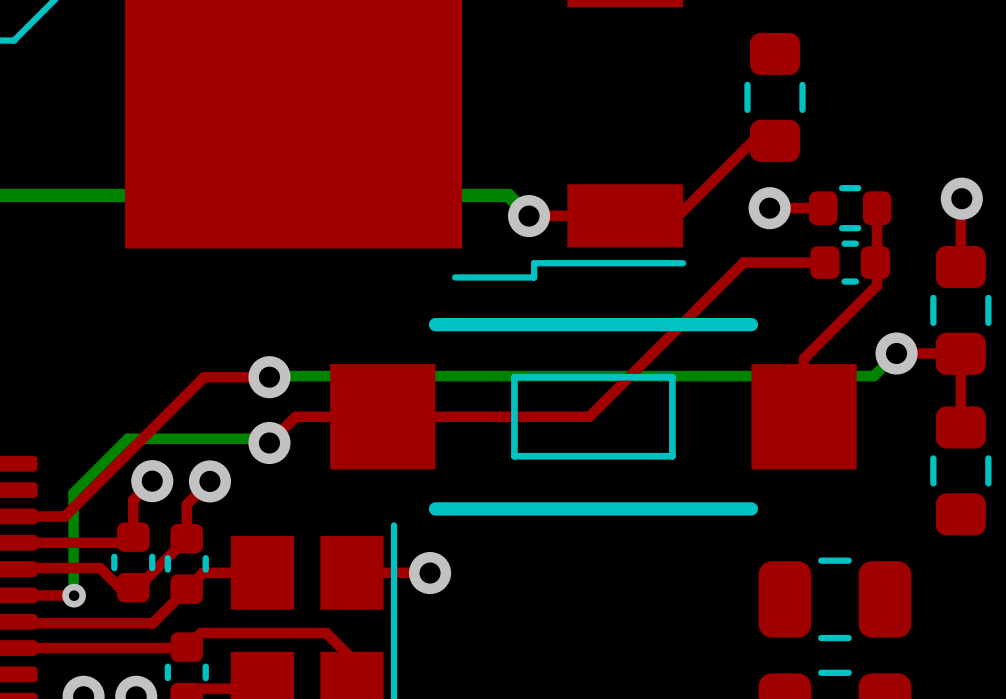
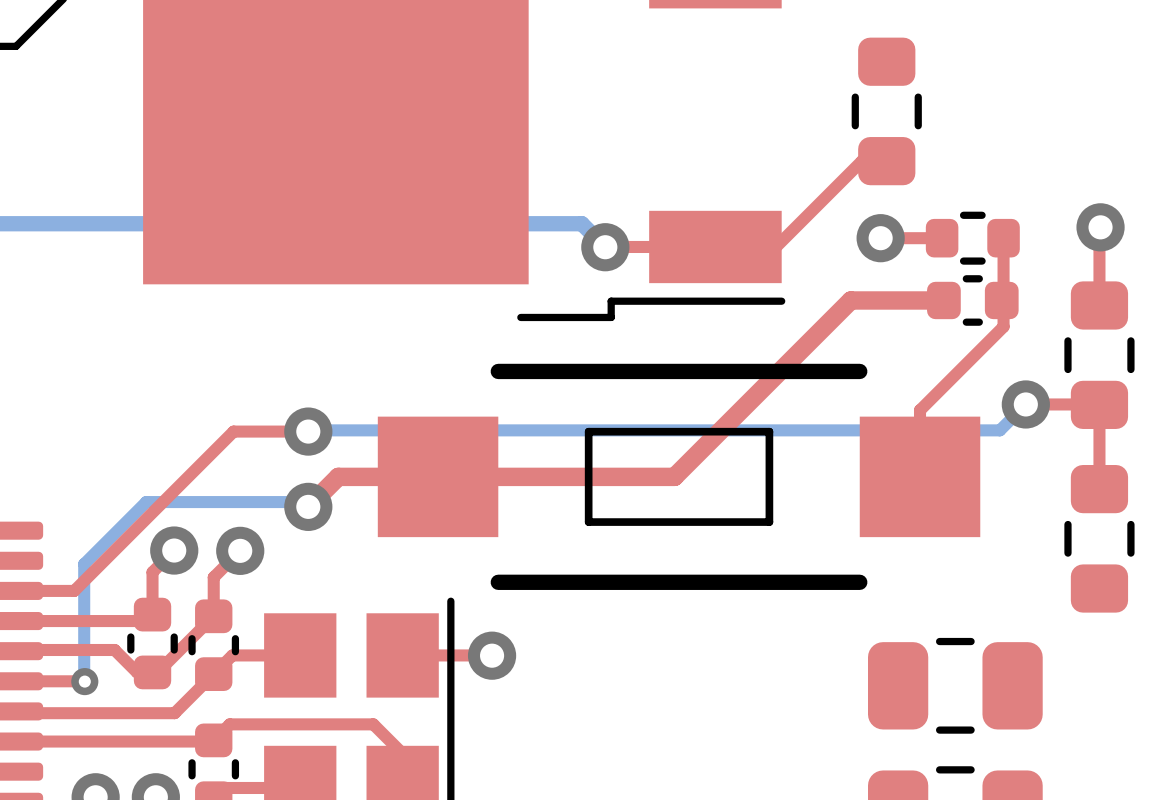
top track width: thin (824, 262) (743, 262) (589, 416) (295, 416) (269, 442) -> thick (943, 300) (850, 300) (674, 476) (338, 476) (308, 506)

